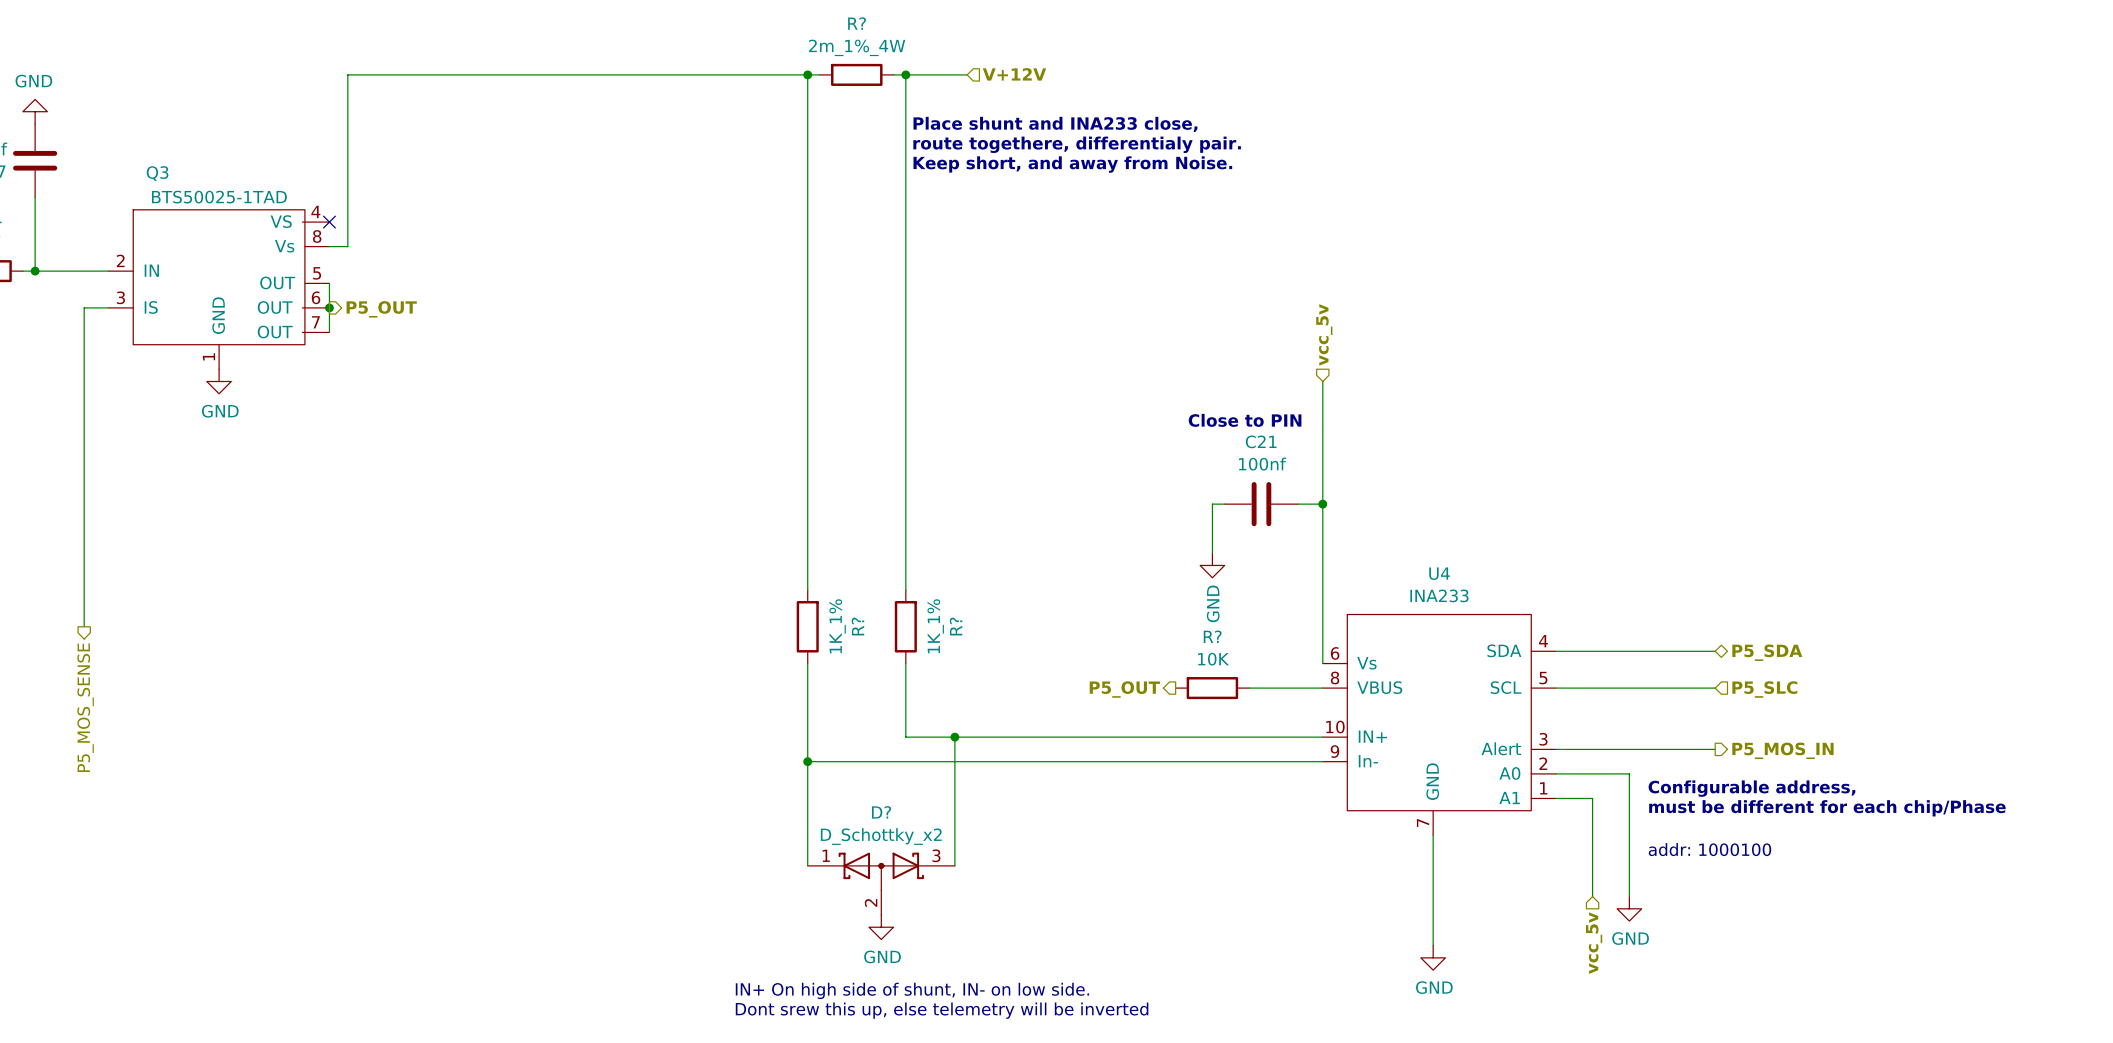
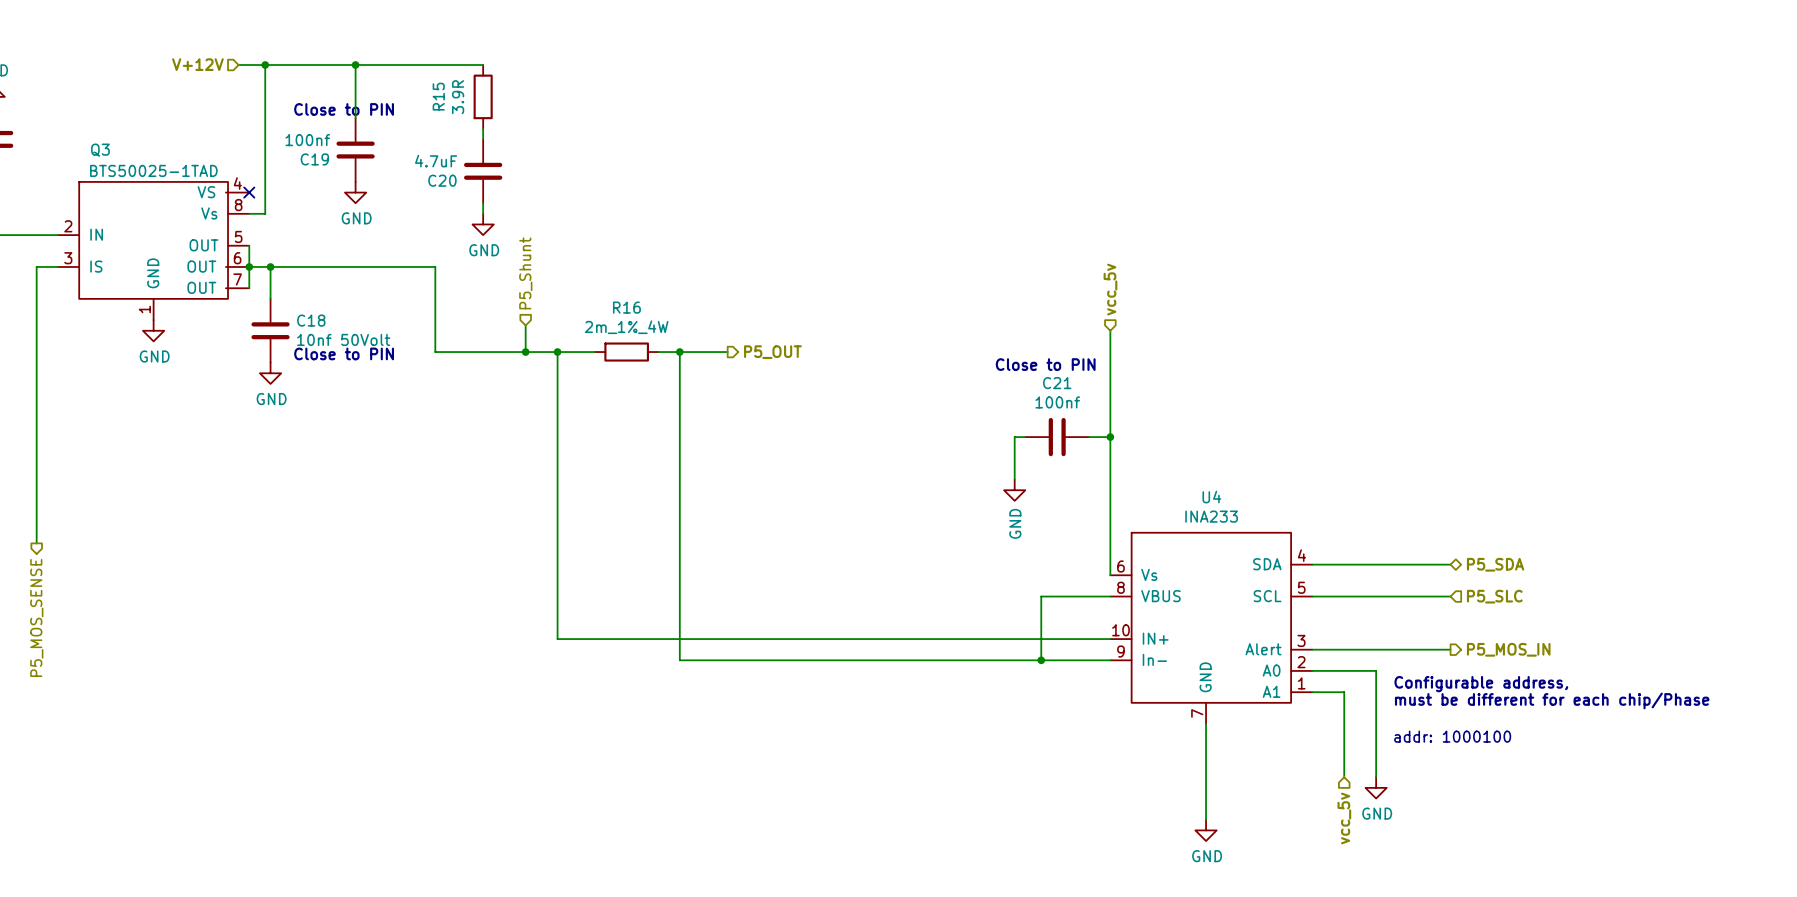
hierarchical label: none -> V+12V (197, 64)
wire: none -> (238, 65) (265, 65)
junction: none -> (265, 65)
wire: none -> (355, 65) (355, 118)
junction: none -> (355, 65)
wire: (599, 74) (819, 74) -> none
wire: (807, 74) (807, 589) -> none
junction: (807, 74) -> none
R?: 2m_1%_4W (856, 74) -> none
wire: (893, 74) (967, 74) -> none
wire: (905, 74) (905, 589) -> none
junction: (905, 74) -> none
hierarchical label: V+12V (1014, 74) -> none
R15: none -> 3.9R (483, 96)
text: Place shunt and INA233 close, (1055, 124) -> none
text: none -> Close to PIN (344, 109)
text: route togethere, differentialy pair. (1077, 144) -> none
wire: none -> (483, 128) (483, 139)
text: Keep short, and away from Noise. (1072, 164) -> none
C19: none -> 100nf (355, 150)
C20: none -> 4.7uF (483, 171)
power symbol: none -> GND (355, 192)
wire: none -> (483, 203) (483, 213)
power symbol: none -> GND (483, 224)
wire: none -> (249, 266) (435, 266) (435, 352) (594, 352)
wire: none -> (270, 266) (270, 298)
junction: none -> (270, 266)
hierarchical label: P5_OUT (381, 309) -> none
hierarchical label: none -> P5_Shunt (525, 273)
wire: none -> (525, 325) (525, 352)
C18: none -> 10nf 50Volt (270, 330)
junction: none -> (525, 352)
junction: none -> (557, 352)
R16: none -> 2m_1%_4W (626, 352)
wire: none -> (658, 352) (727, 352)
junction: none -> (679, 352)
hierarchical label: none -> P5_OUT (772, 352)
text: none -> Close to PIN (344, 353)
power symbol: none -> GND (270, 373)
R?: 1K_1% (807, 626) -> none
R?: 1K_1% (905, 626) -> none
wire: (807, 663) (807, 865) -> none
wire: (905, 663) (905, 737) -> (557, 352) (557, 639) (748, 639)
R?: 10K (1212, 688) -> none
wire: none -> (1046, 596) (1041, 596) (1041, 660)
hierarchical label: P5_OUT (1124, 689) -> none
wire: (954, 737) (954, 865) -> none
junction: (954, 737) -> none
wire: (807, 761) (826, 761) -> (679, 352) (679, 660)
junction: (807, 761) -> none
junction: none -> (1041, 660)
D?: D_Schottky_x2 (881, 883) -> none
power symbol: GND (881, 927) -> none
text: IN+ On high side of shunt, IN- on low side. (912, 990) -> none
text: Dont srew this up, else telemetry will be inverted (942, 1010) -> none

